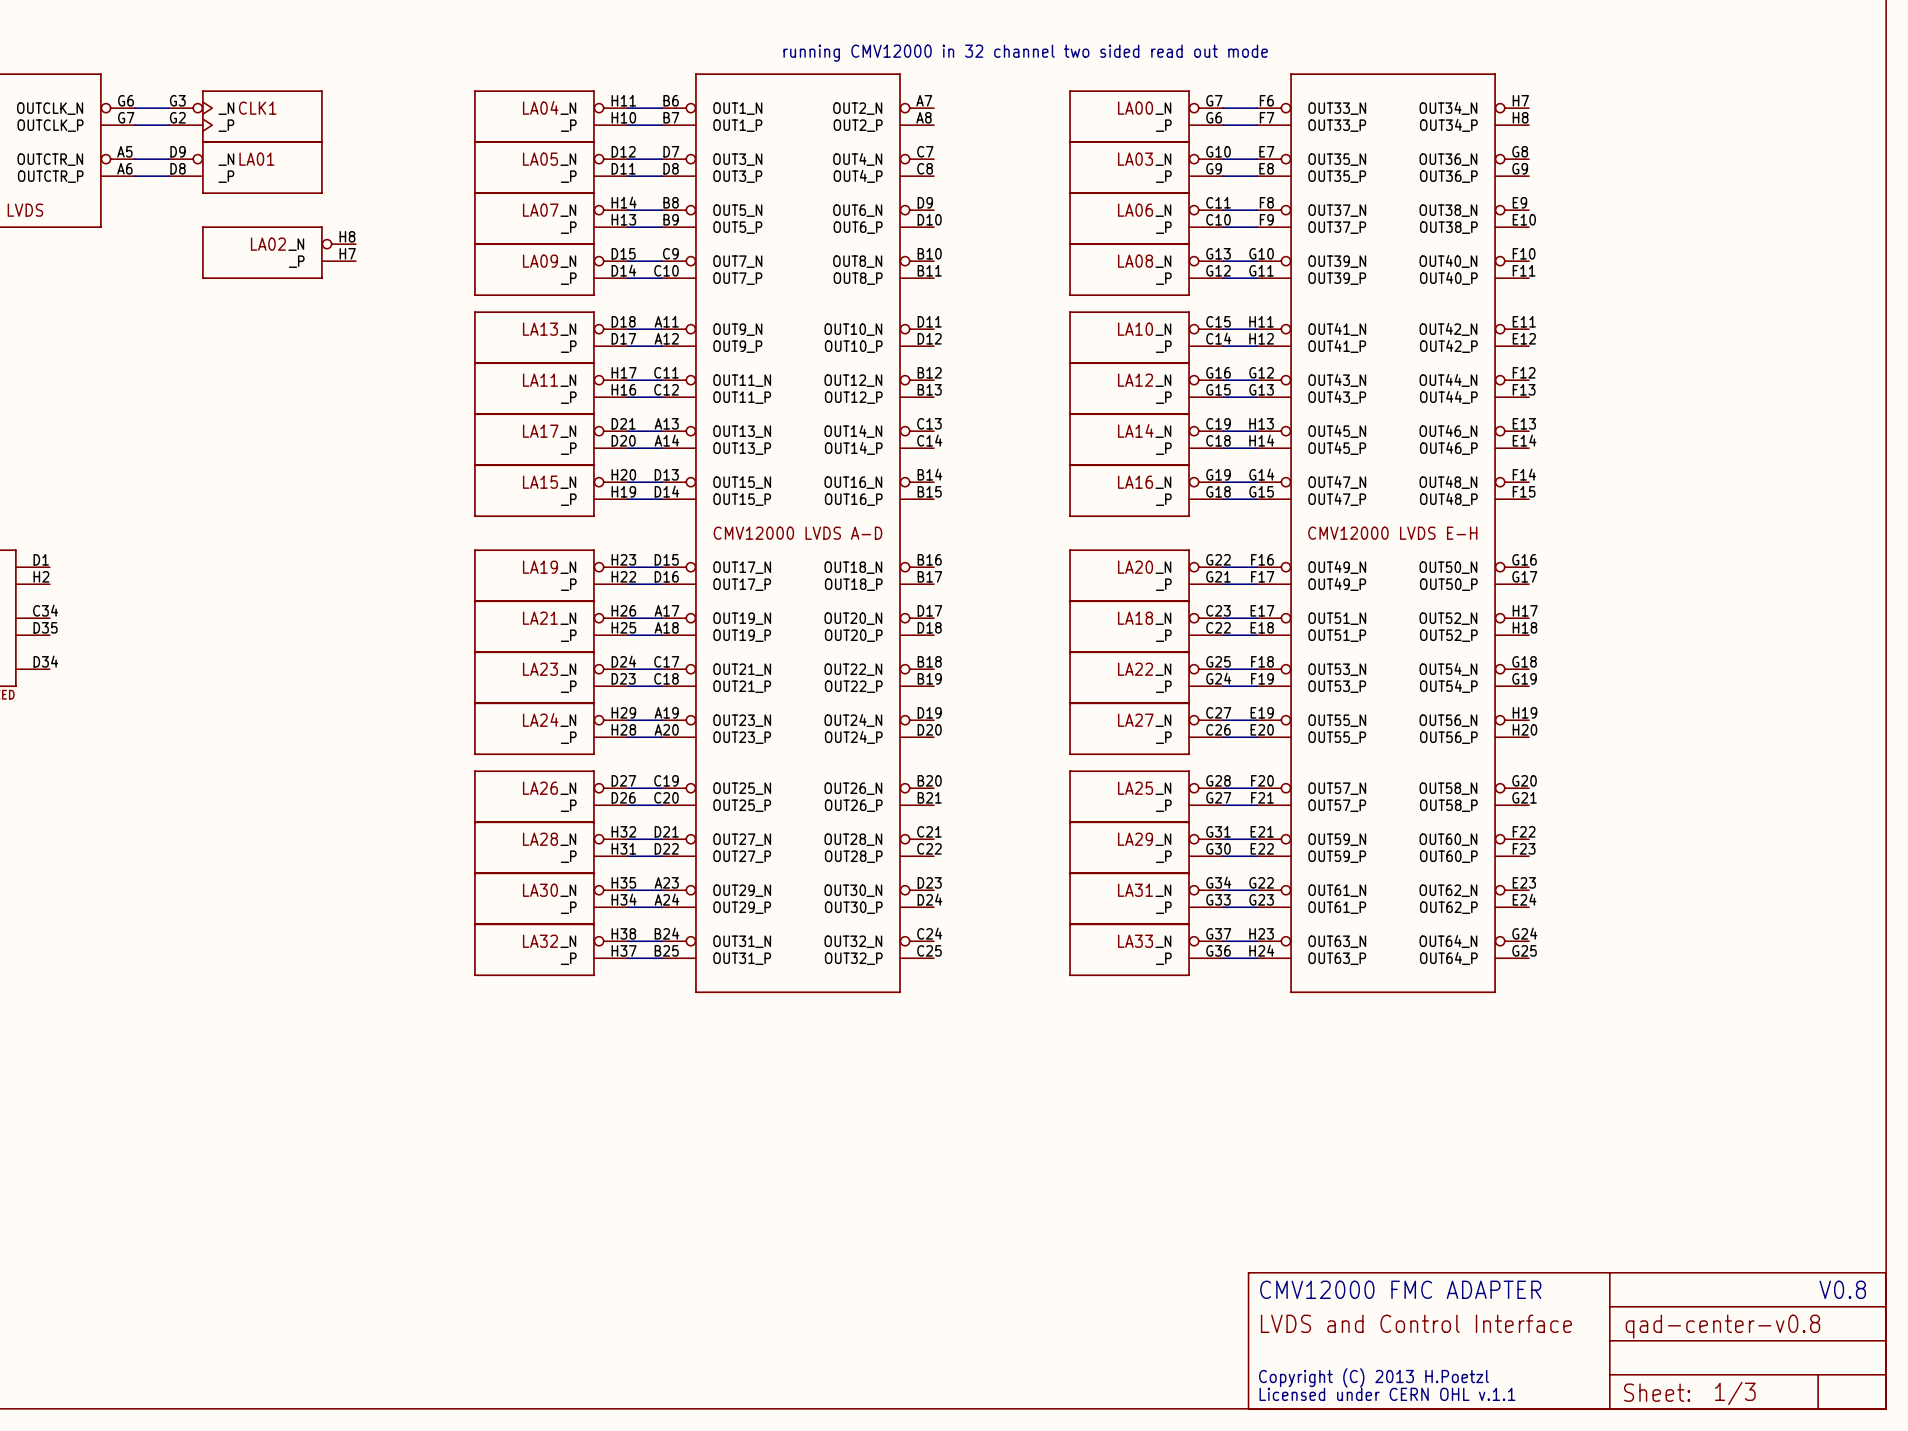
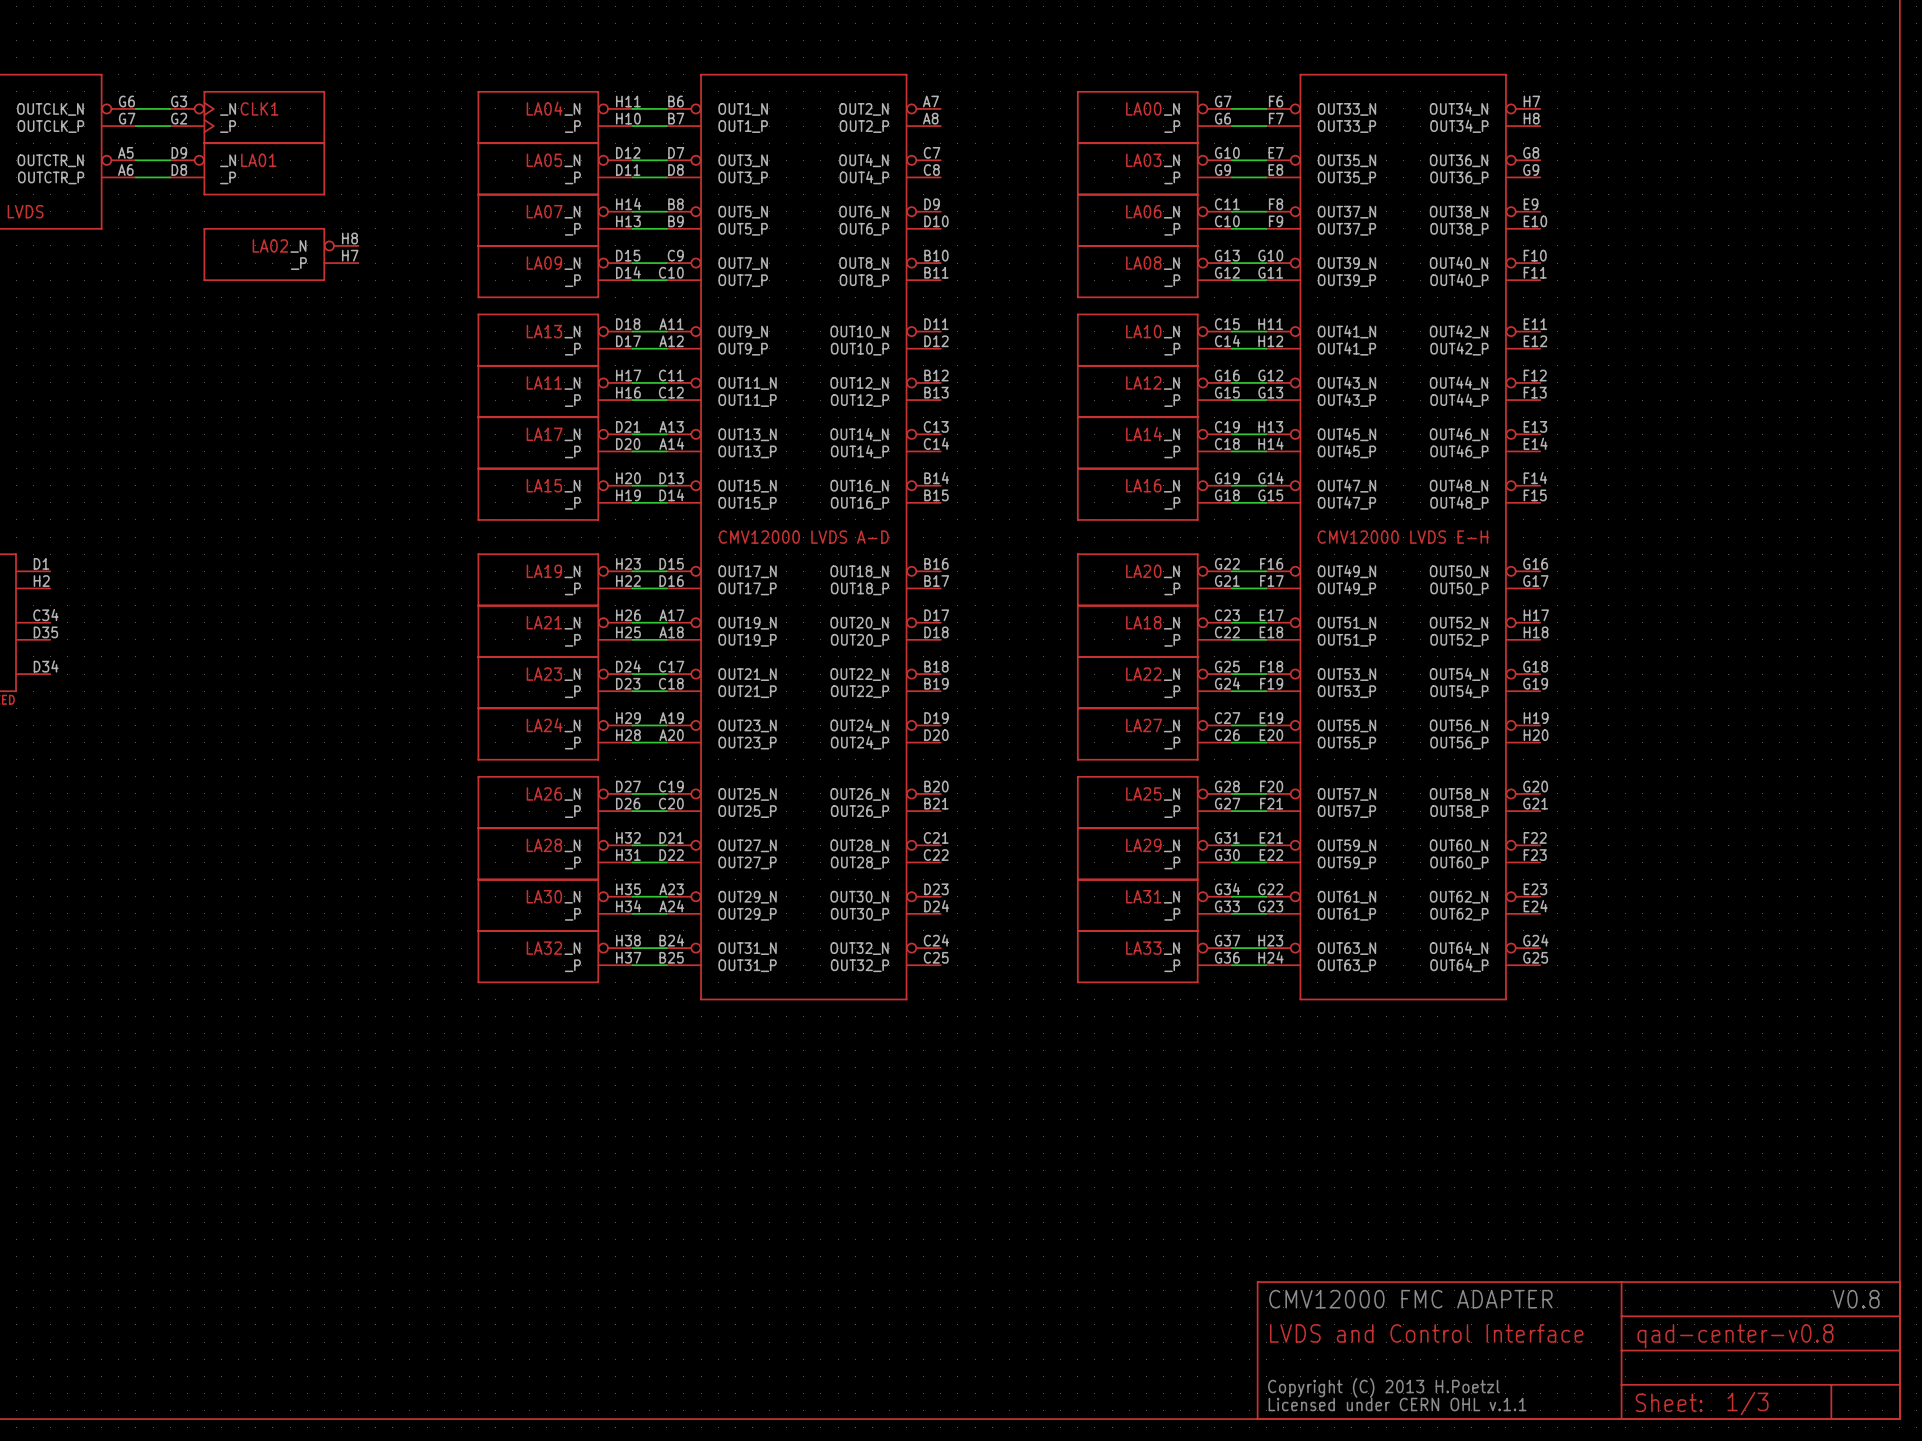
text: running CMV12000 in 32 channel two sided read out mode (1025, 53) -> none

